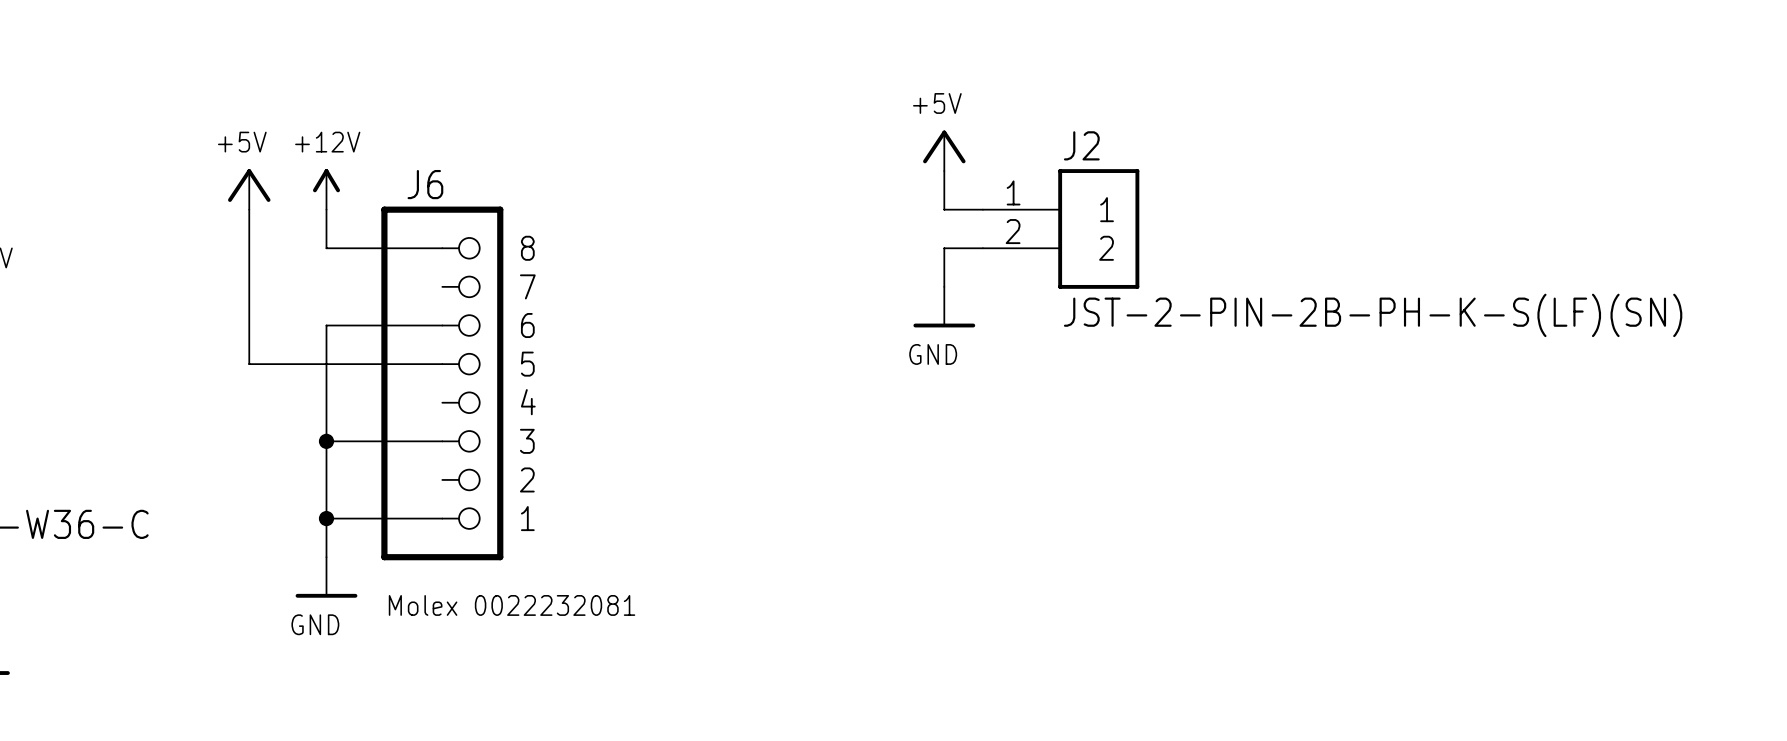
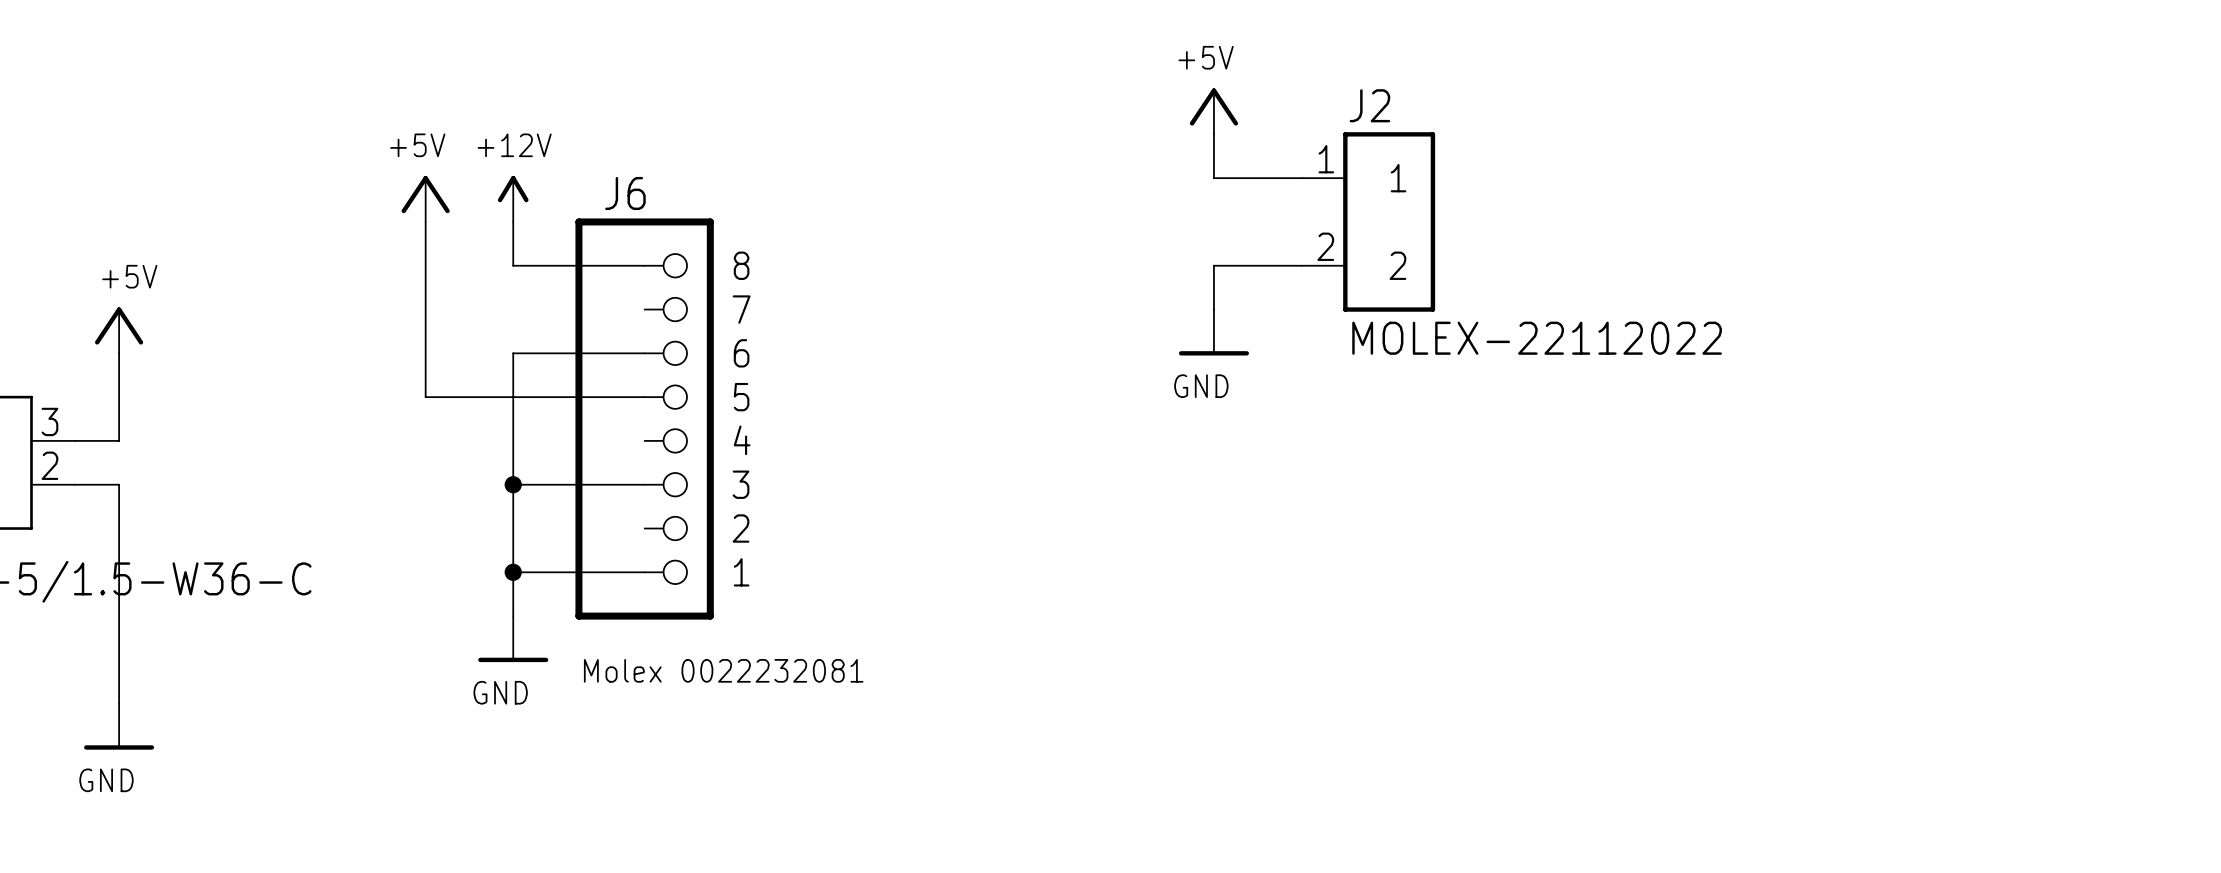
wire: none -> (1213, 134) (1213, 178) (1301, 178)
power symbol position: +5V (944, 150) -> +5V (1213, 111)
J2 symbol: [982, 169, 1140, 289] -> [1301, 132, 1436, 312]
wire: (944, 171) (944, 209) (982, 209) -> none
J2 value: JST-2-PIN-2B-PH-K-S(LF)(SN) (1373, 315) -> MOLEX-22112022 (1537, 338)

